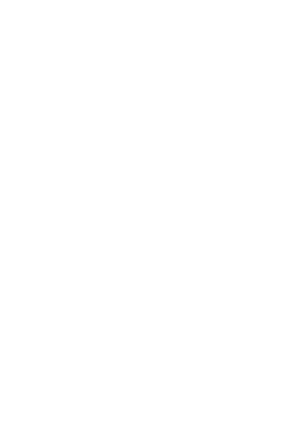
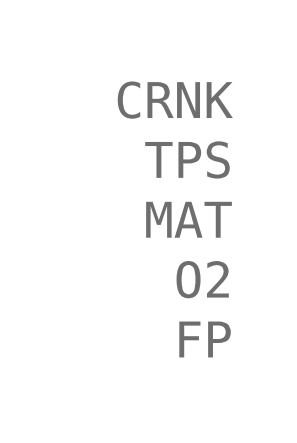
label: none -> CRNK (175, 100)
label: none -> TPS (187, 159)
label: none -> MAT (189, 219)
label: none -> O2 (202, 279)
label: none -> FP (205, 339)

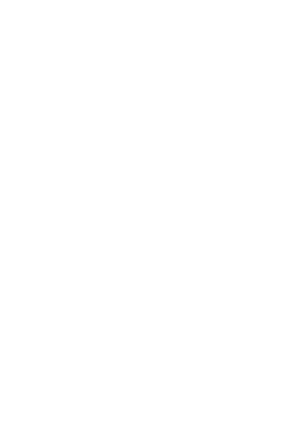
label: CRNK (175, 100) -> none
label: TPS (187, 159) -> none
label: MAT (189, 219) -> none
label: O2 (202, 279) -> none
label: FP (205, 339) -> none

